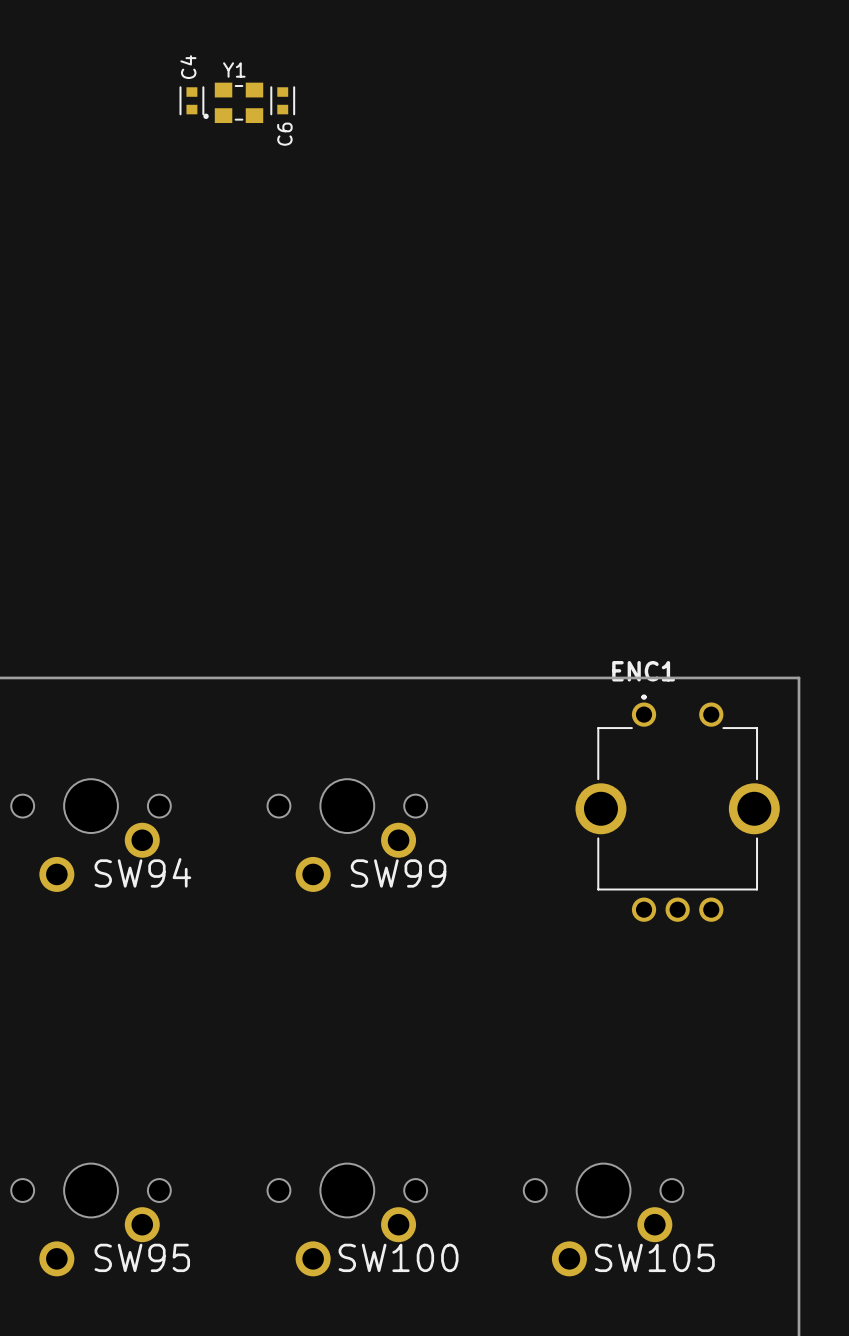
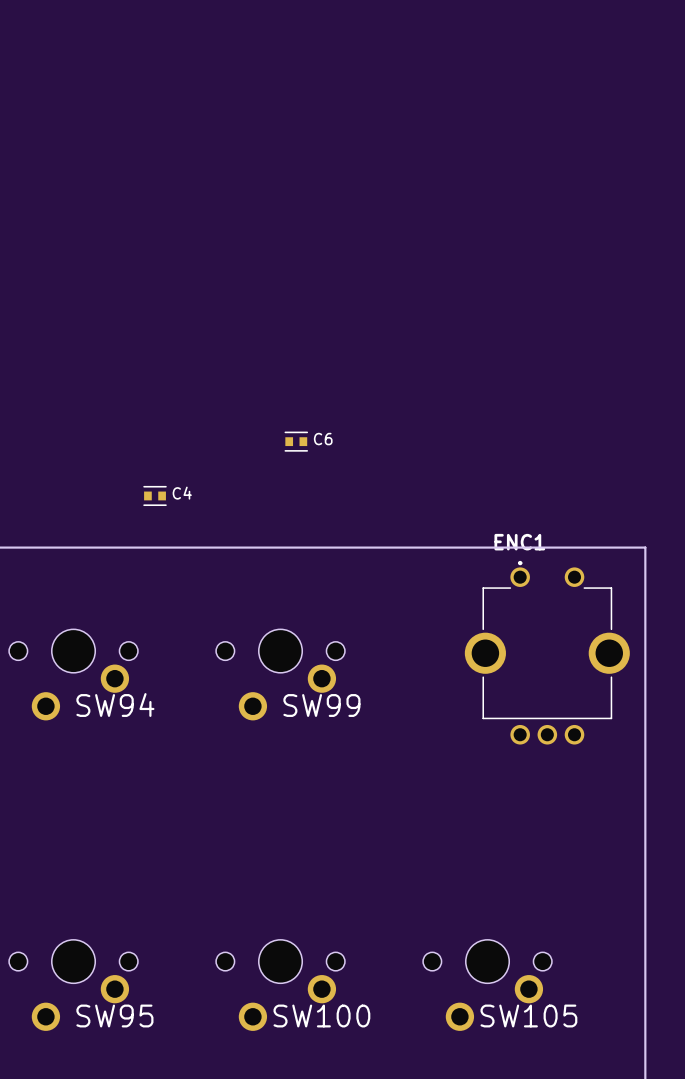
C4 rotation: 0° (191, 100) -> 90° clockwise (155, 495)
C4 position: (191, 100) -> (155, 495)
C6 rotation: 0° (282, 100) -> 90° clockwise (296, 441)
C6 position: (282, 100) -> (296, 441)
Y1: (233, 102) -> none
C6 name position: C6 (284, 134) -> C6 (323, 439)

